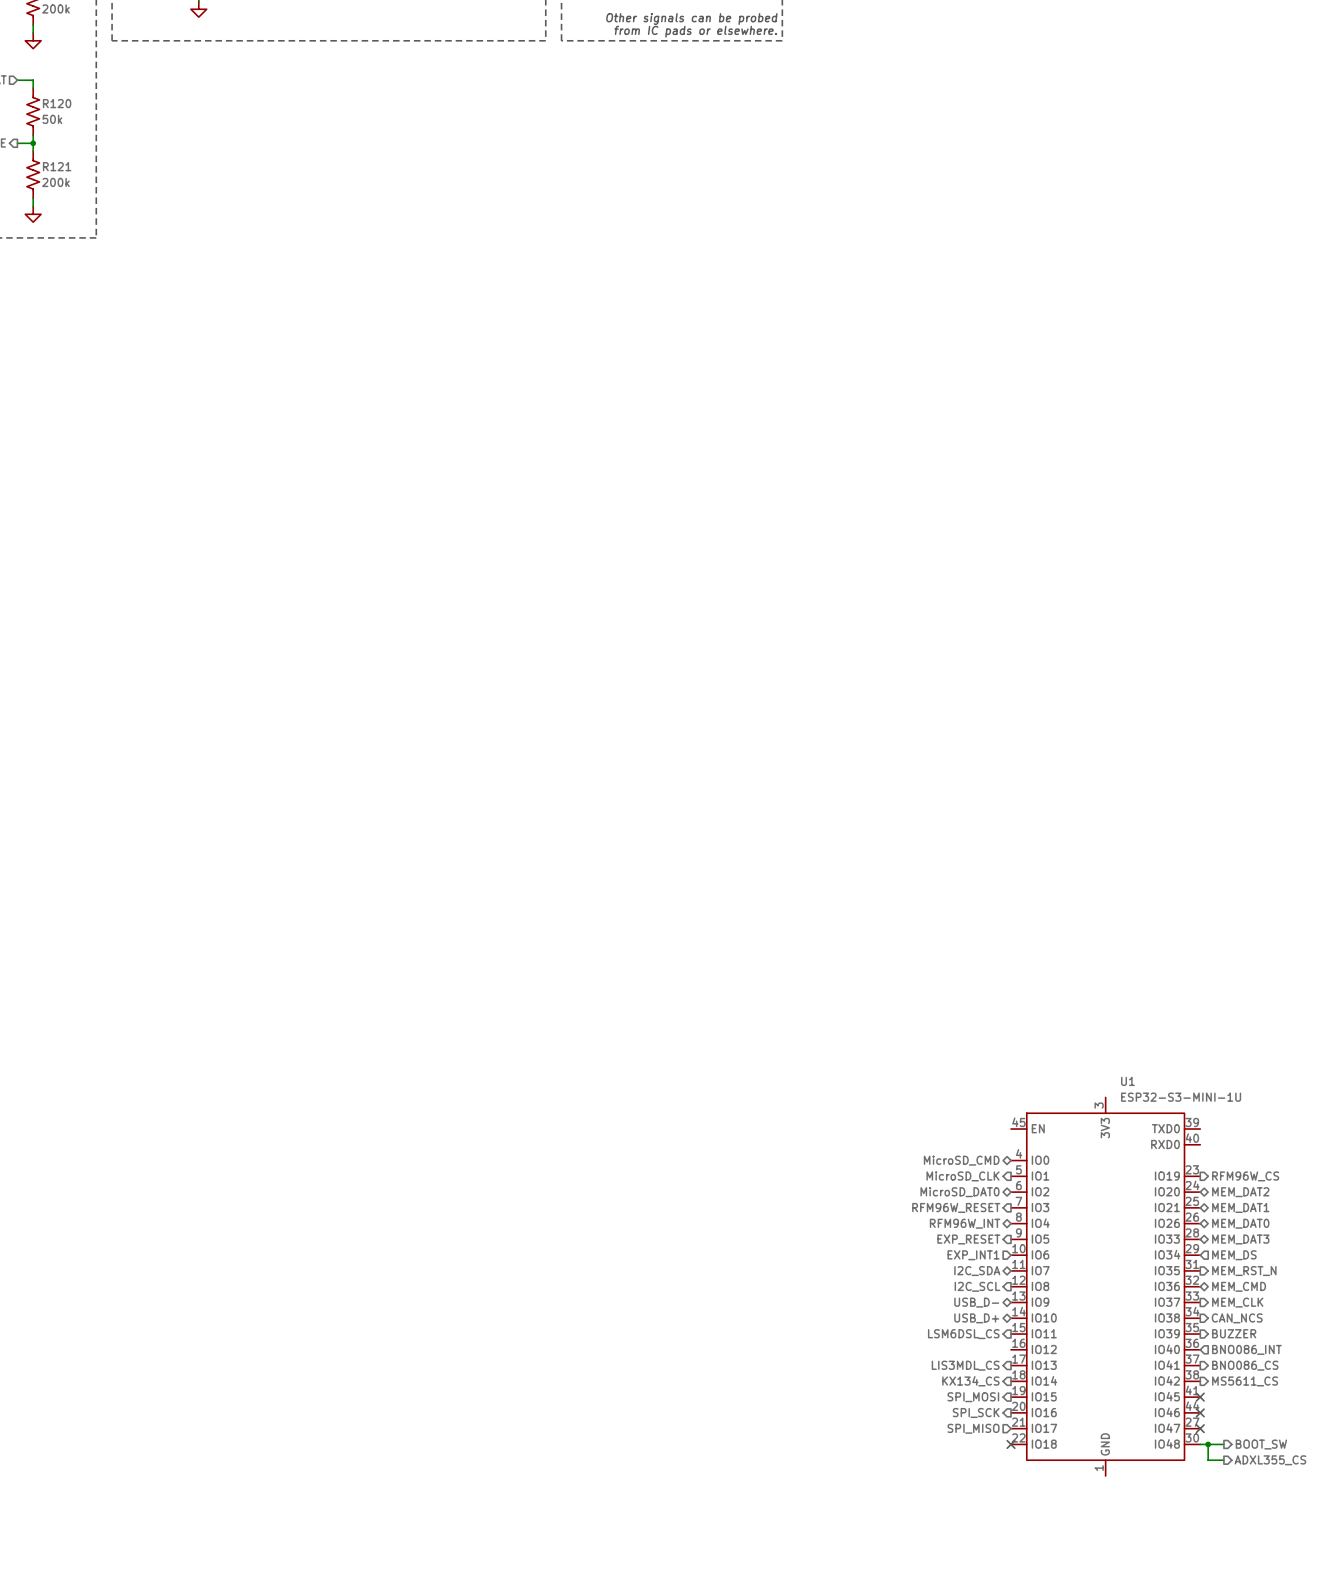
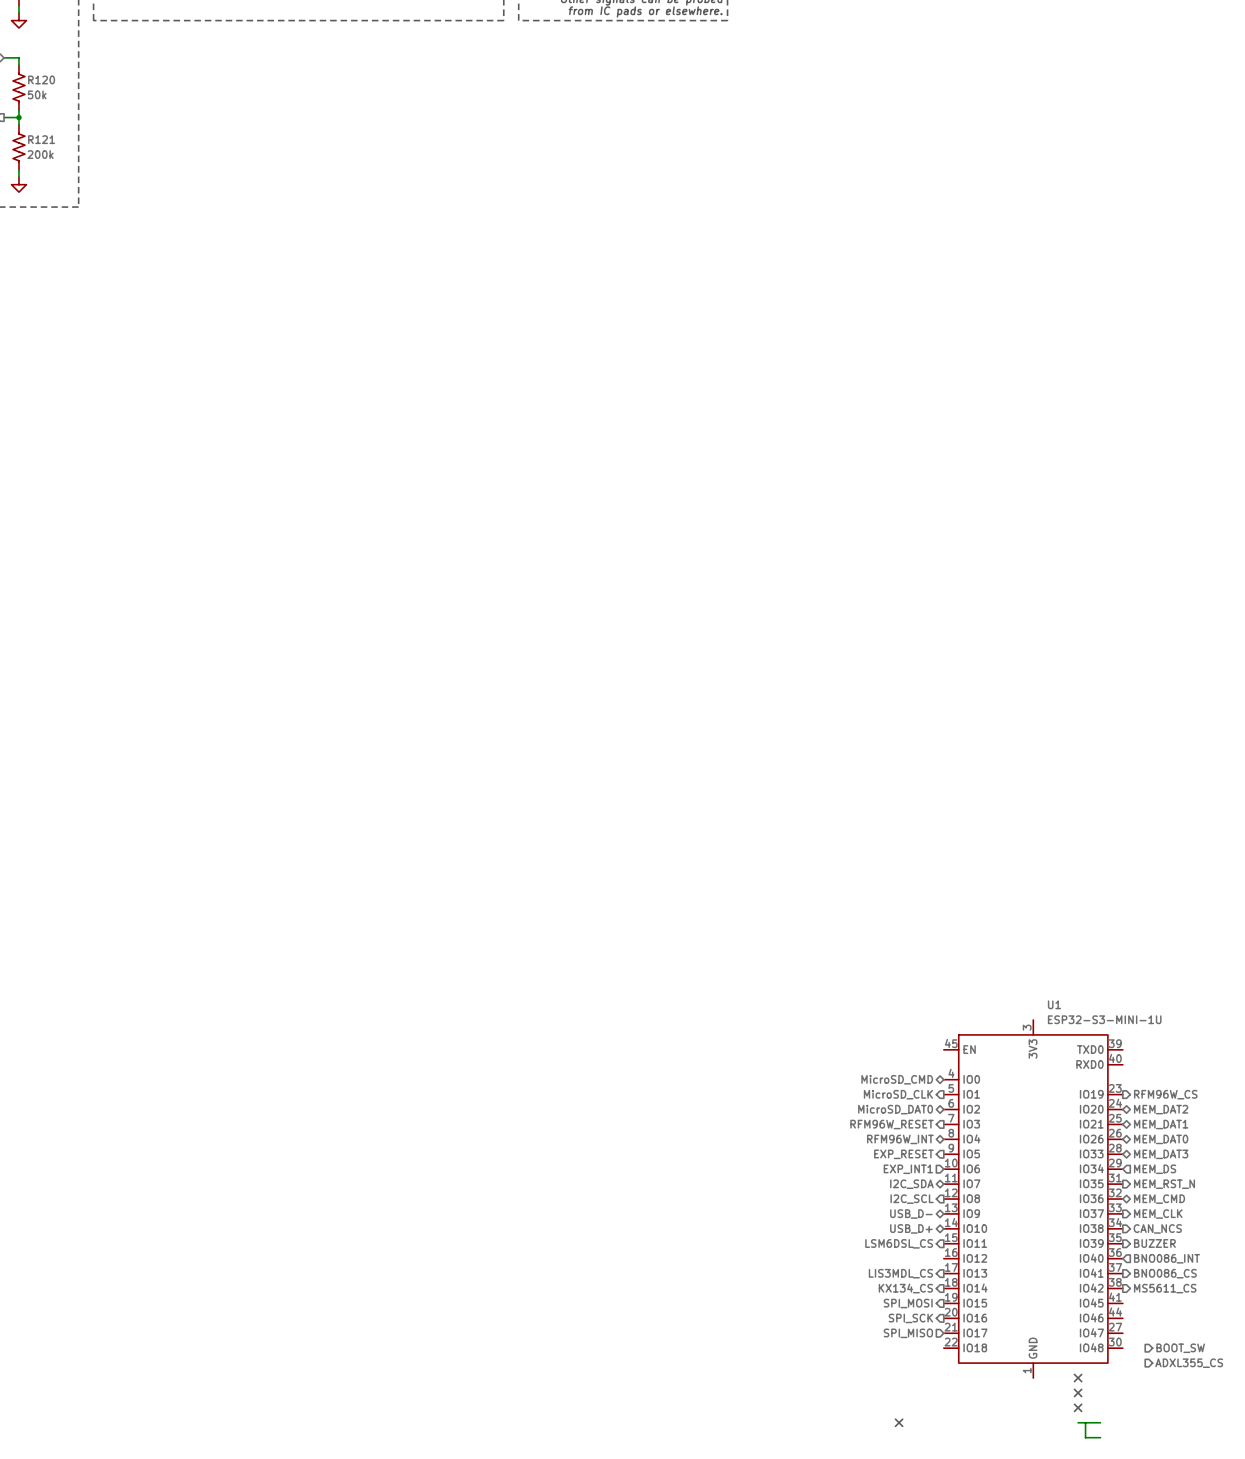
no-connect mark: (1200, 1397) -> none
no-connect mark: (1200, 1412) -> none
no-connect mark: (1200, 1428) -> none
no-connect mark: (1011, 1444) -> none
wire: (1200, 1444) (1223, 1444) -> (1078, 1422) (1100, 1422)
wire: (1208, 1444) (1208, 1460) (1223, 1460) -> (1085, 1422) (1085, 1437) (1100, 1437)
junction: (1208, 1444) -> none
no-connect mark: none -> (1078, 1378)
no-connect mark: none -> (1078, 1392)
no-connect mark: none -> (1078, 1407)
no-connect mark: none -> (899, 1422)

